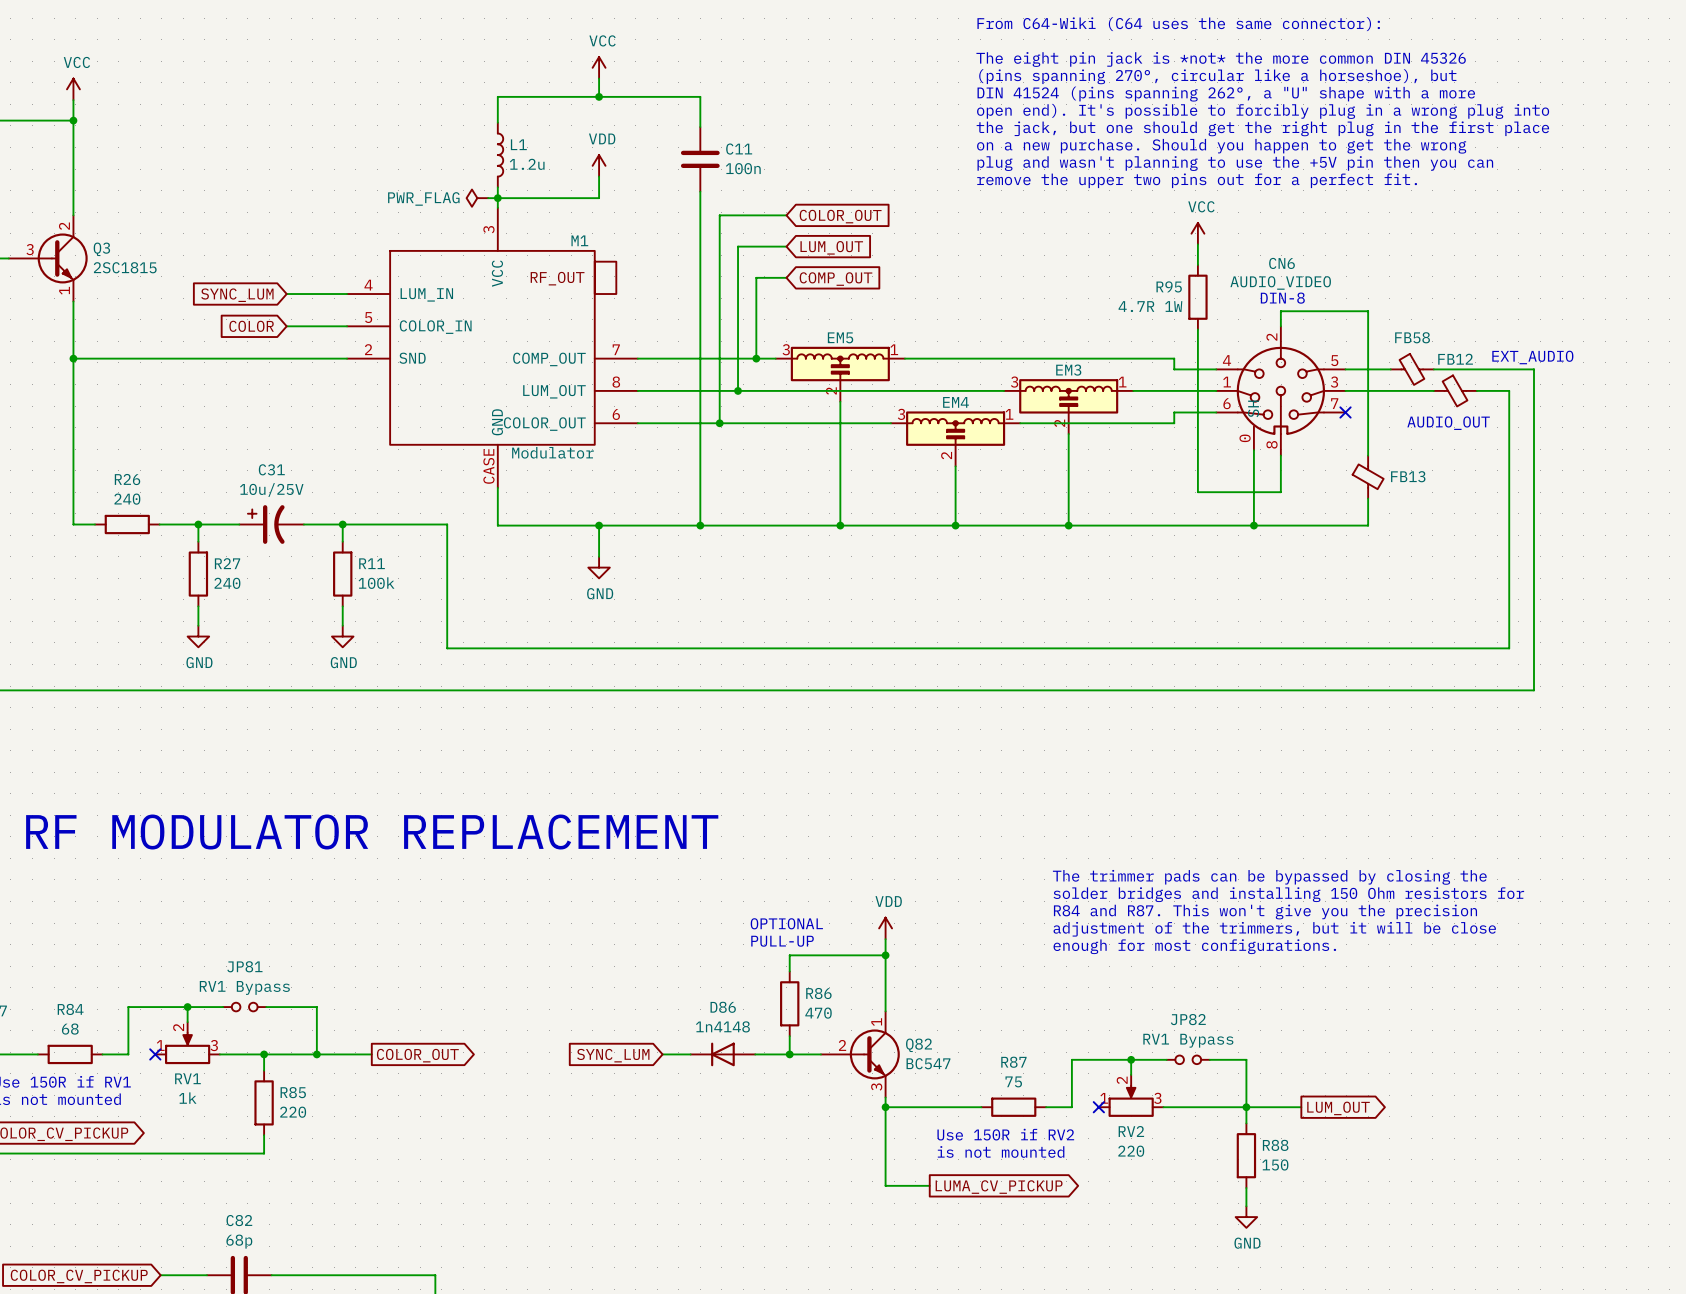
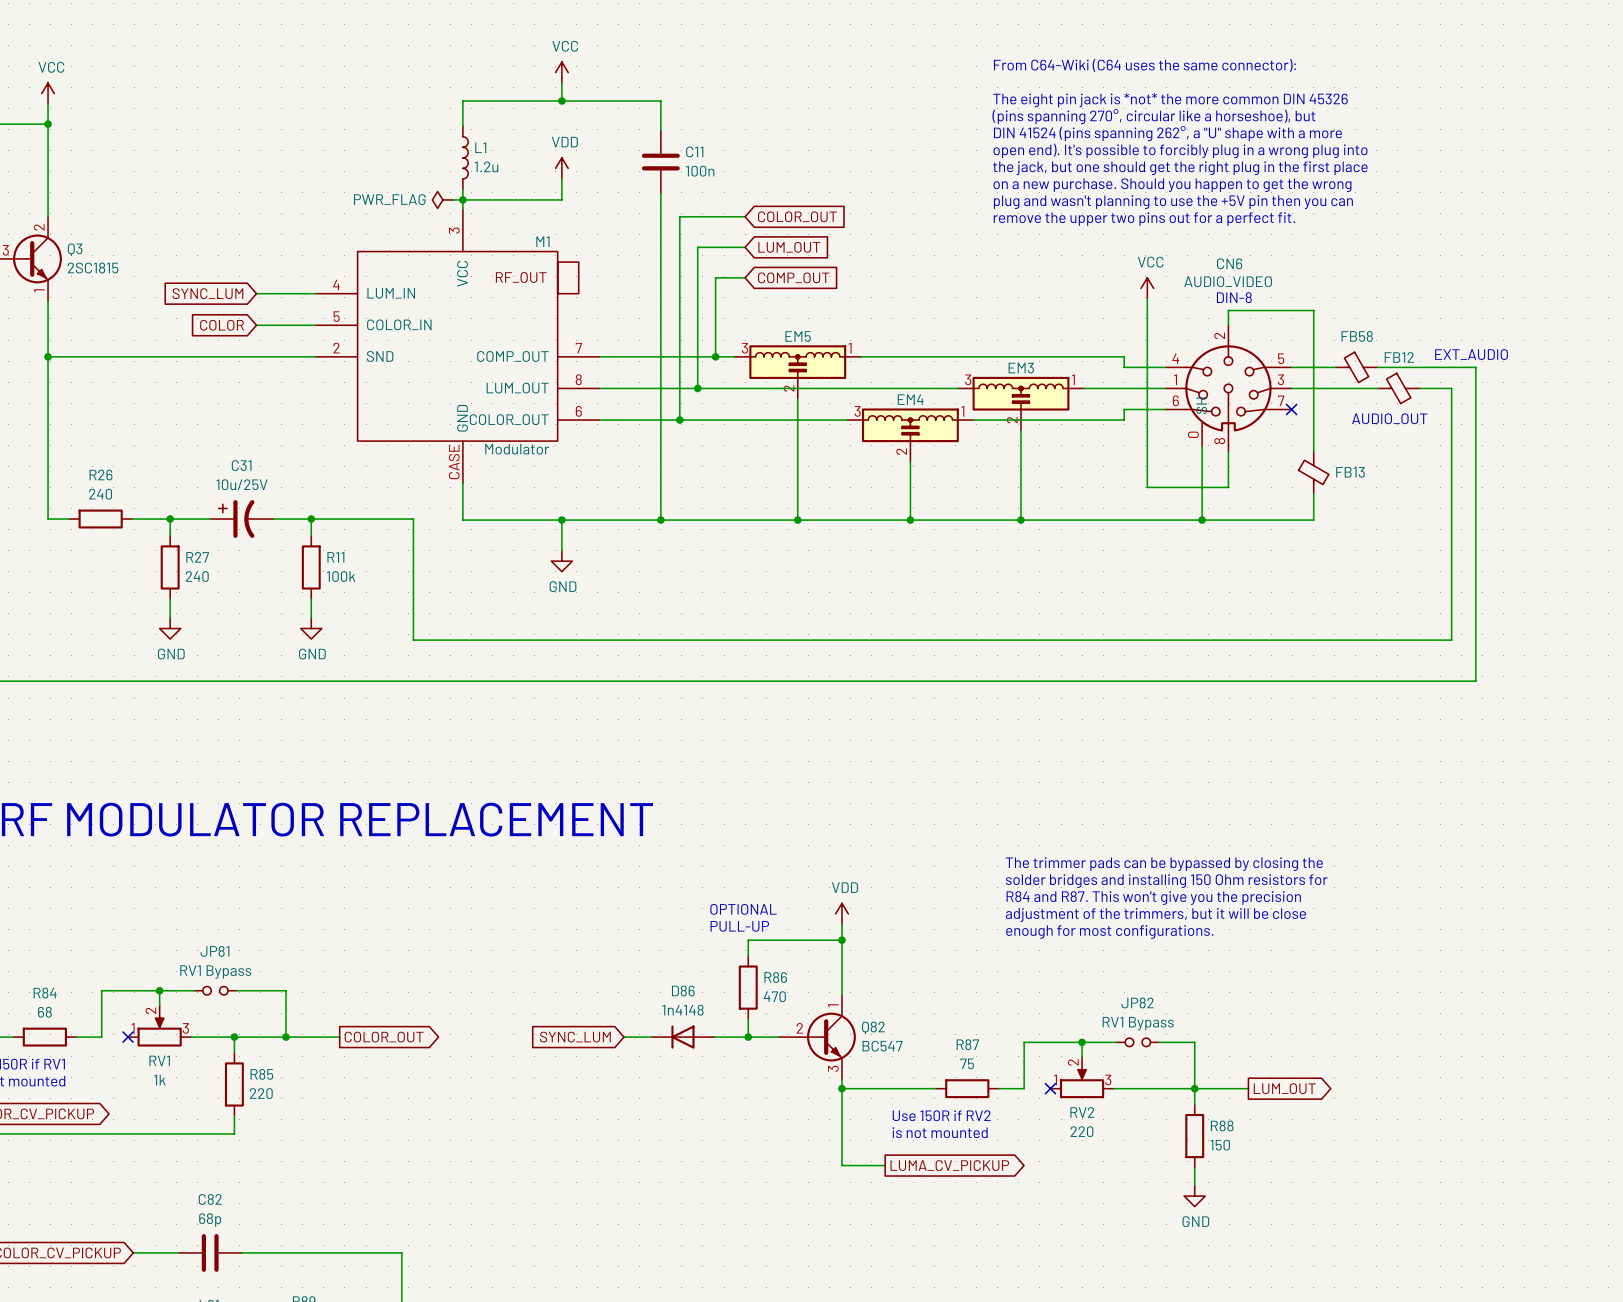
text position: From C64-Wiki (C64 uses the same connector): (1178, 24) -> From C64-Wiki (C64 uses the same connector): (1144, 65)
text position: The eight pin jack is *not* the more common DIN 45326 (1221, 59) -> The eight pin jack is *not* the more common DIN 45326 (1170, 100)
text position: (pins spanning 270°, circular like a horseshoe), but (1217, 76) -> (pins spanning 270°, circular like a horseshoe), but (1153, 116)
text position: DIN 41524 (pins spanning 262°, a "U" shape with a more (1226, 94) -> DIN 41524 (pins spanning 262°, a "U" shape with a more (1167, 133)
text position: open end). It's possible to forcibly plug in a wrong plug into (1263, 111) -> open end). It's possible to forcibly plug in a wrong plug into (1180, 150)
text position: the jack, but one should get the right plug in the first place (1262, 128) -> the jack, but one should get the right plug in the first place (1180, 168)
text position: on a new purchase. Should you happen to get the wrong (1221, 146) -> on a new purchase. Should you happen to get the wrong (1172, 185)
text position: plug and wasn't planning to use the +5V pin then you can (1235, 163) -> plug and wasn't planning to use the +5V pin then you can (1173, 202)
text position: remove the upper two pins out for a perfect fit. (1197, 180) -> remove the upper two pins out for a perfect fit. (1144, 219)
power symbol position: VCC (1197, 233) -> VCC (1147, 288)
wire: (1197, 244) (1197, 264) -> none
R95: 4.7R 1W (1197, 297) -> none
wire: none -> (1147, 298) (1147, 328)

